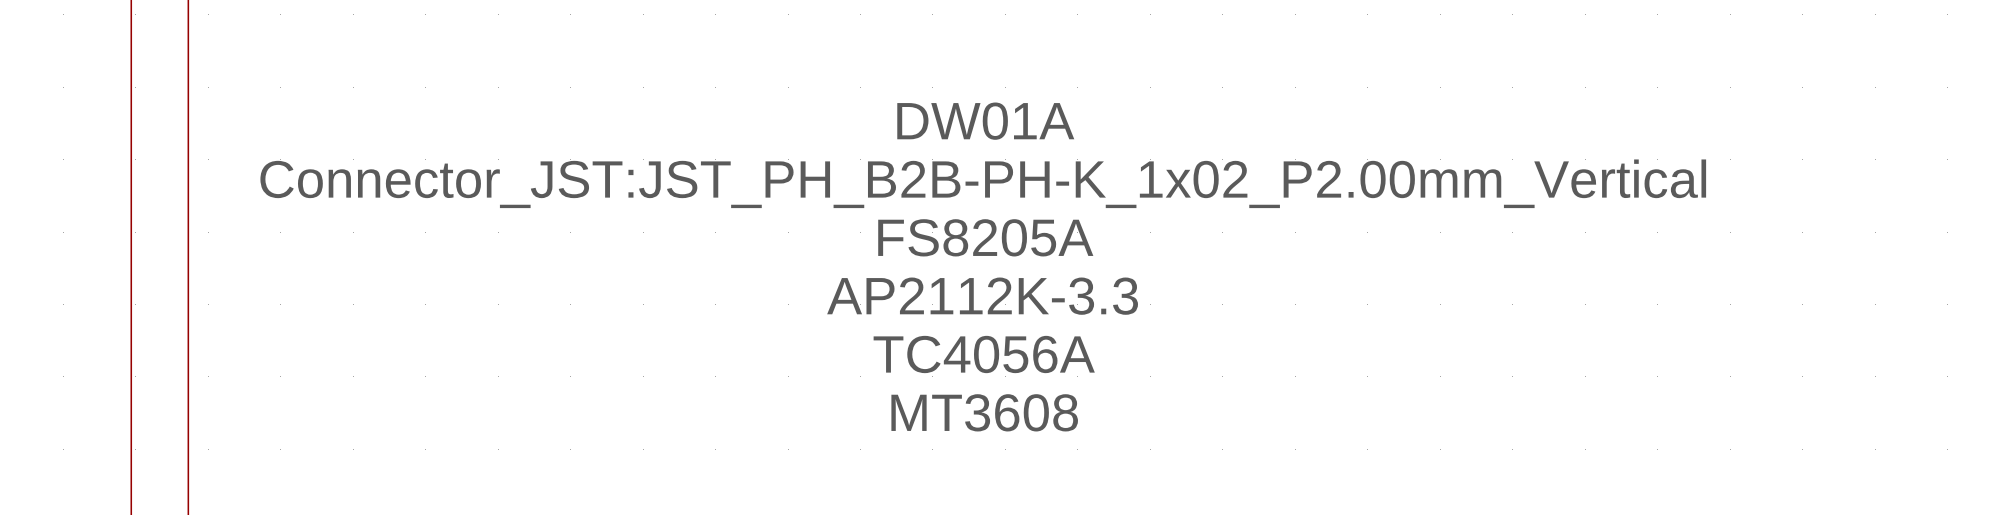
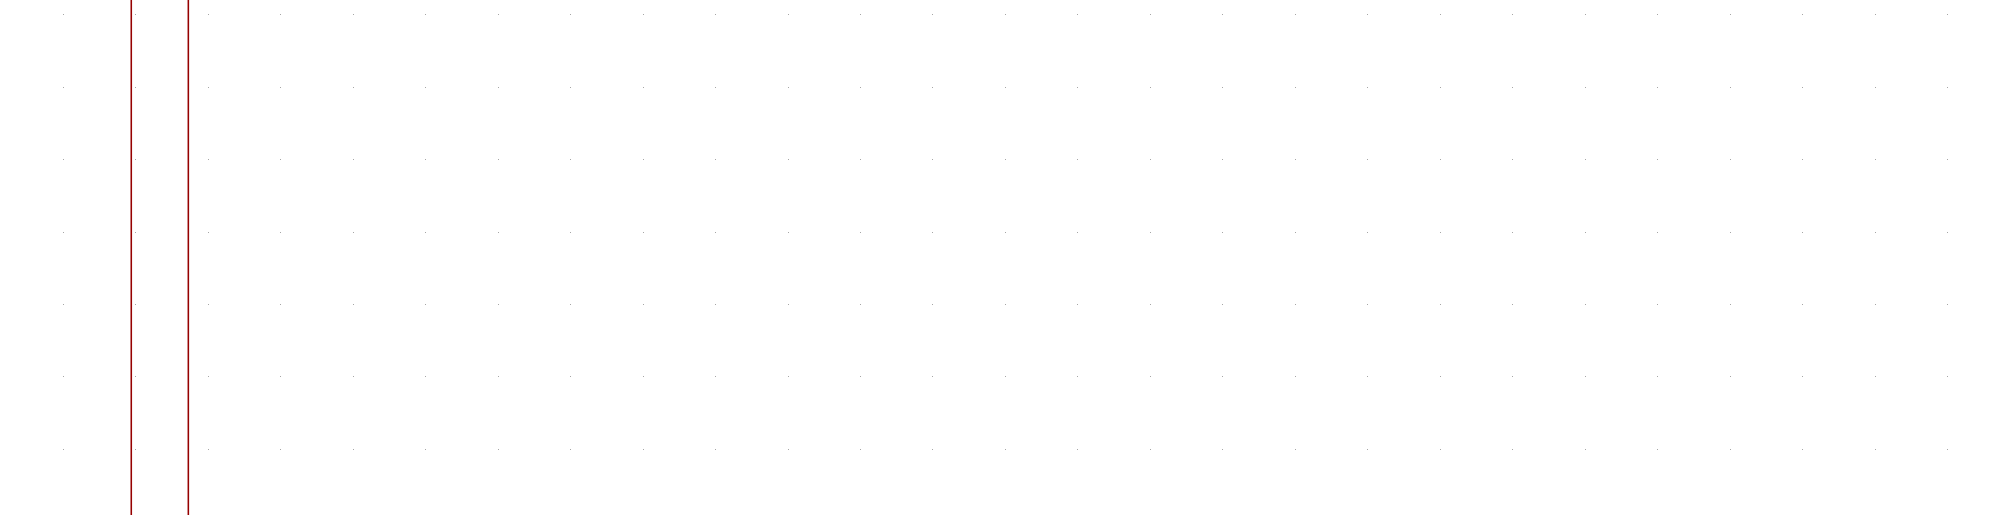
text: DW01A (985, 121) -> none
text: Connector_JST:JST_PH_B2B-PH-K_1x02_P2.00mm_Vertical (983, 183) -> none
text: FS8205A (985, 237) -> none
text: AP2112K-3.3 (982, 296) -> none
text: TC4056A (984, 354) -> none
text: MT3608 (984, 412) -> none

